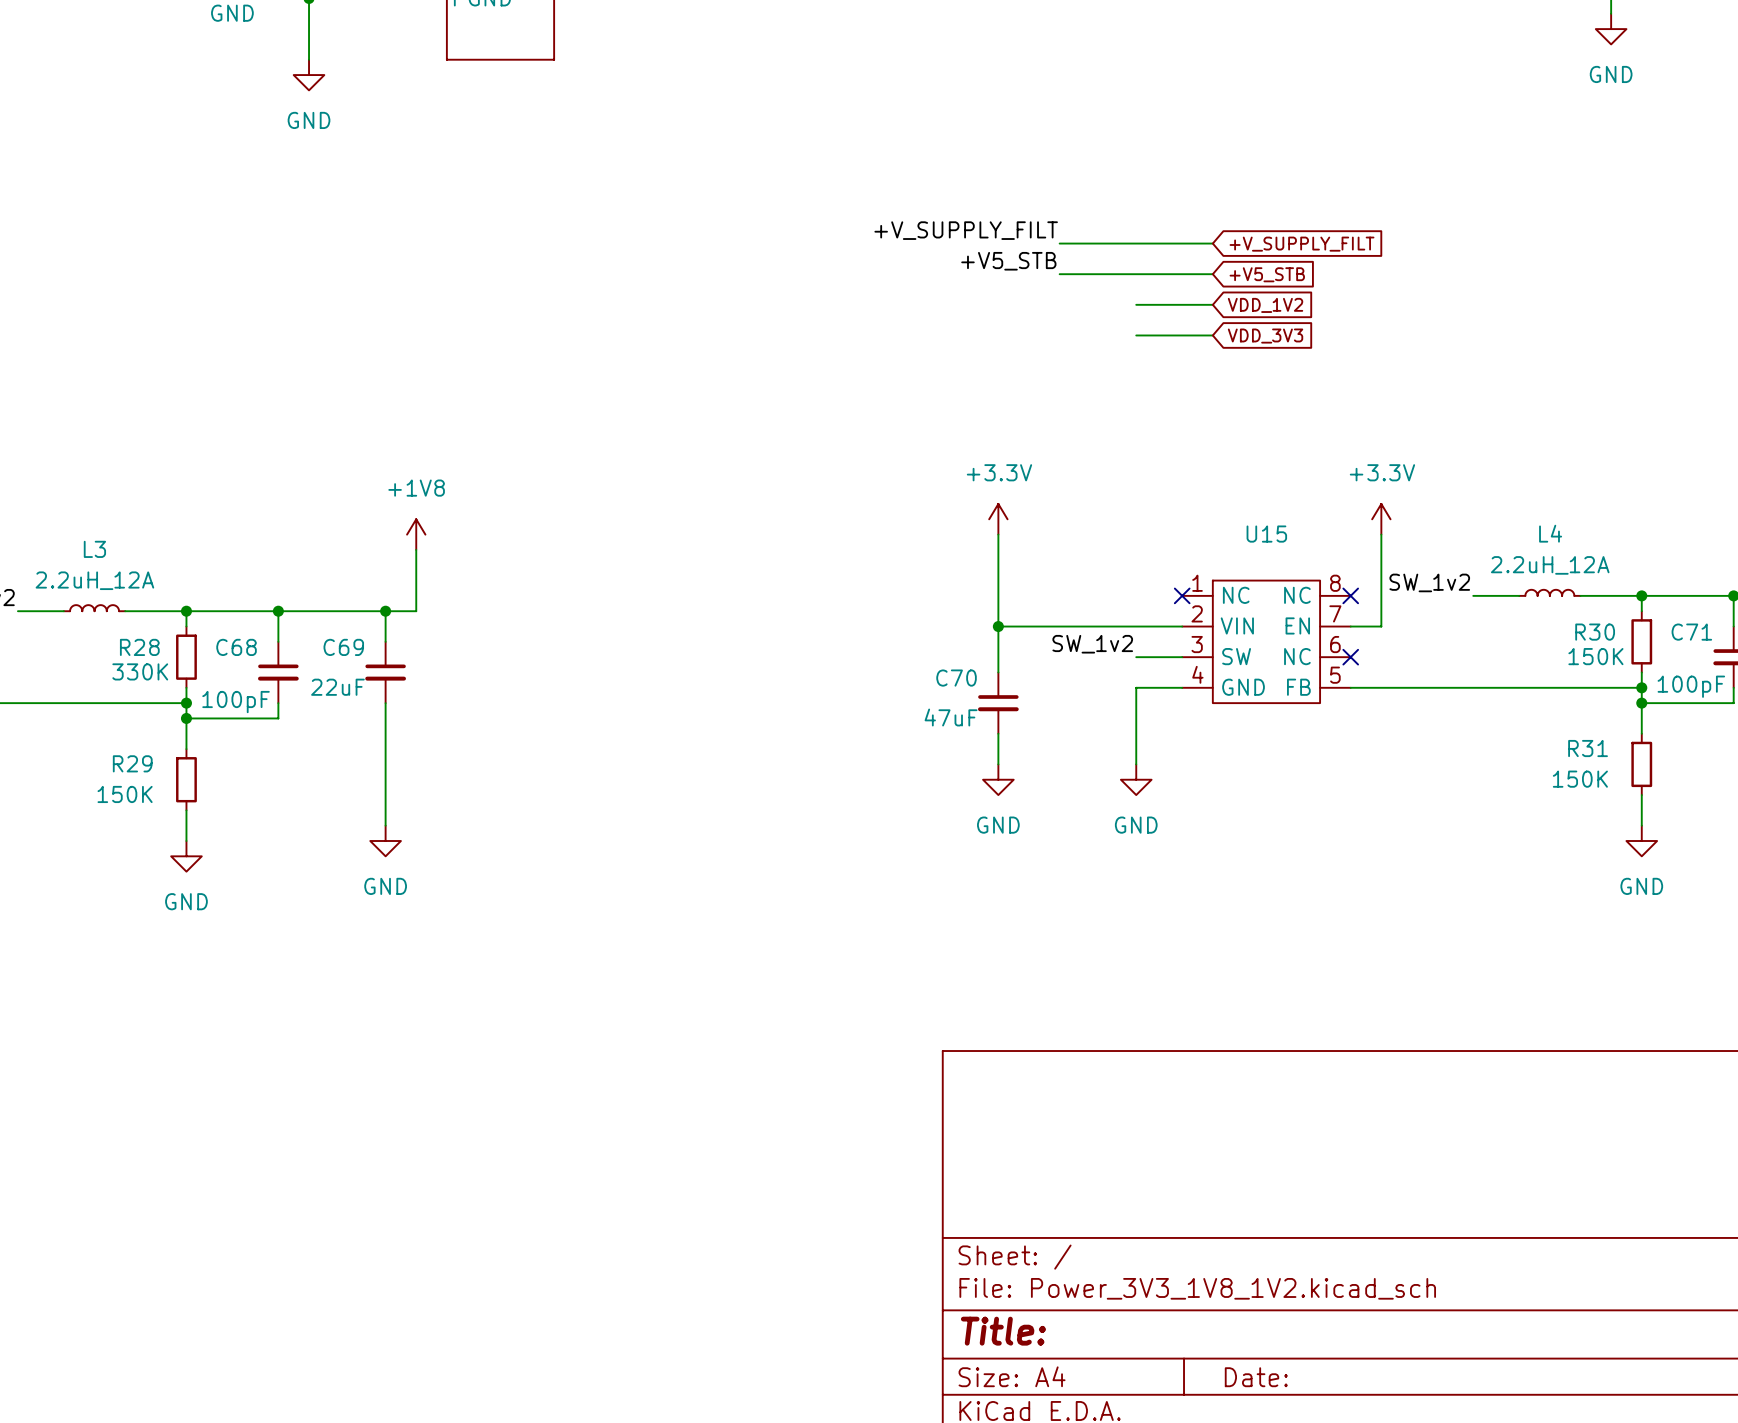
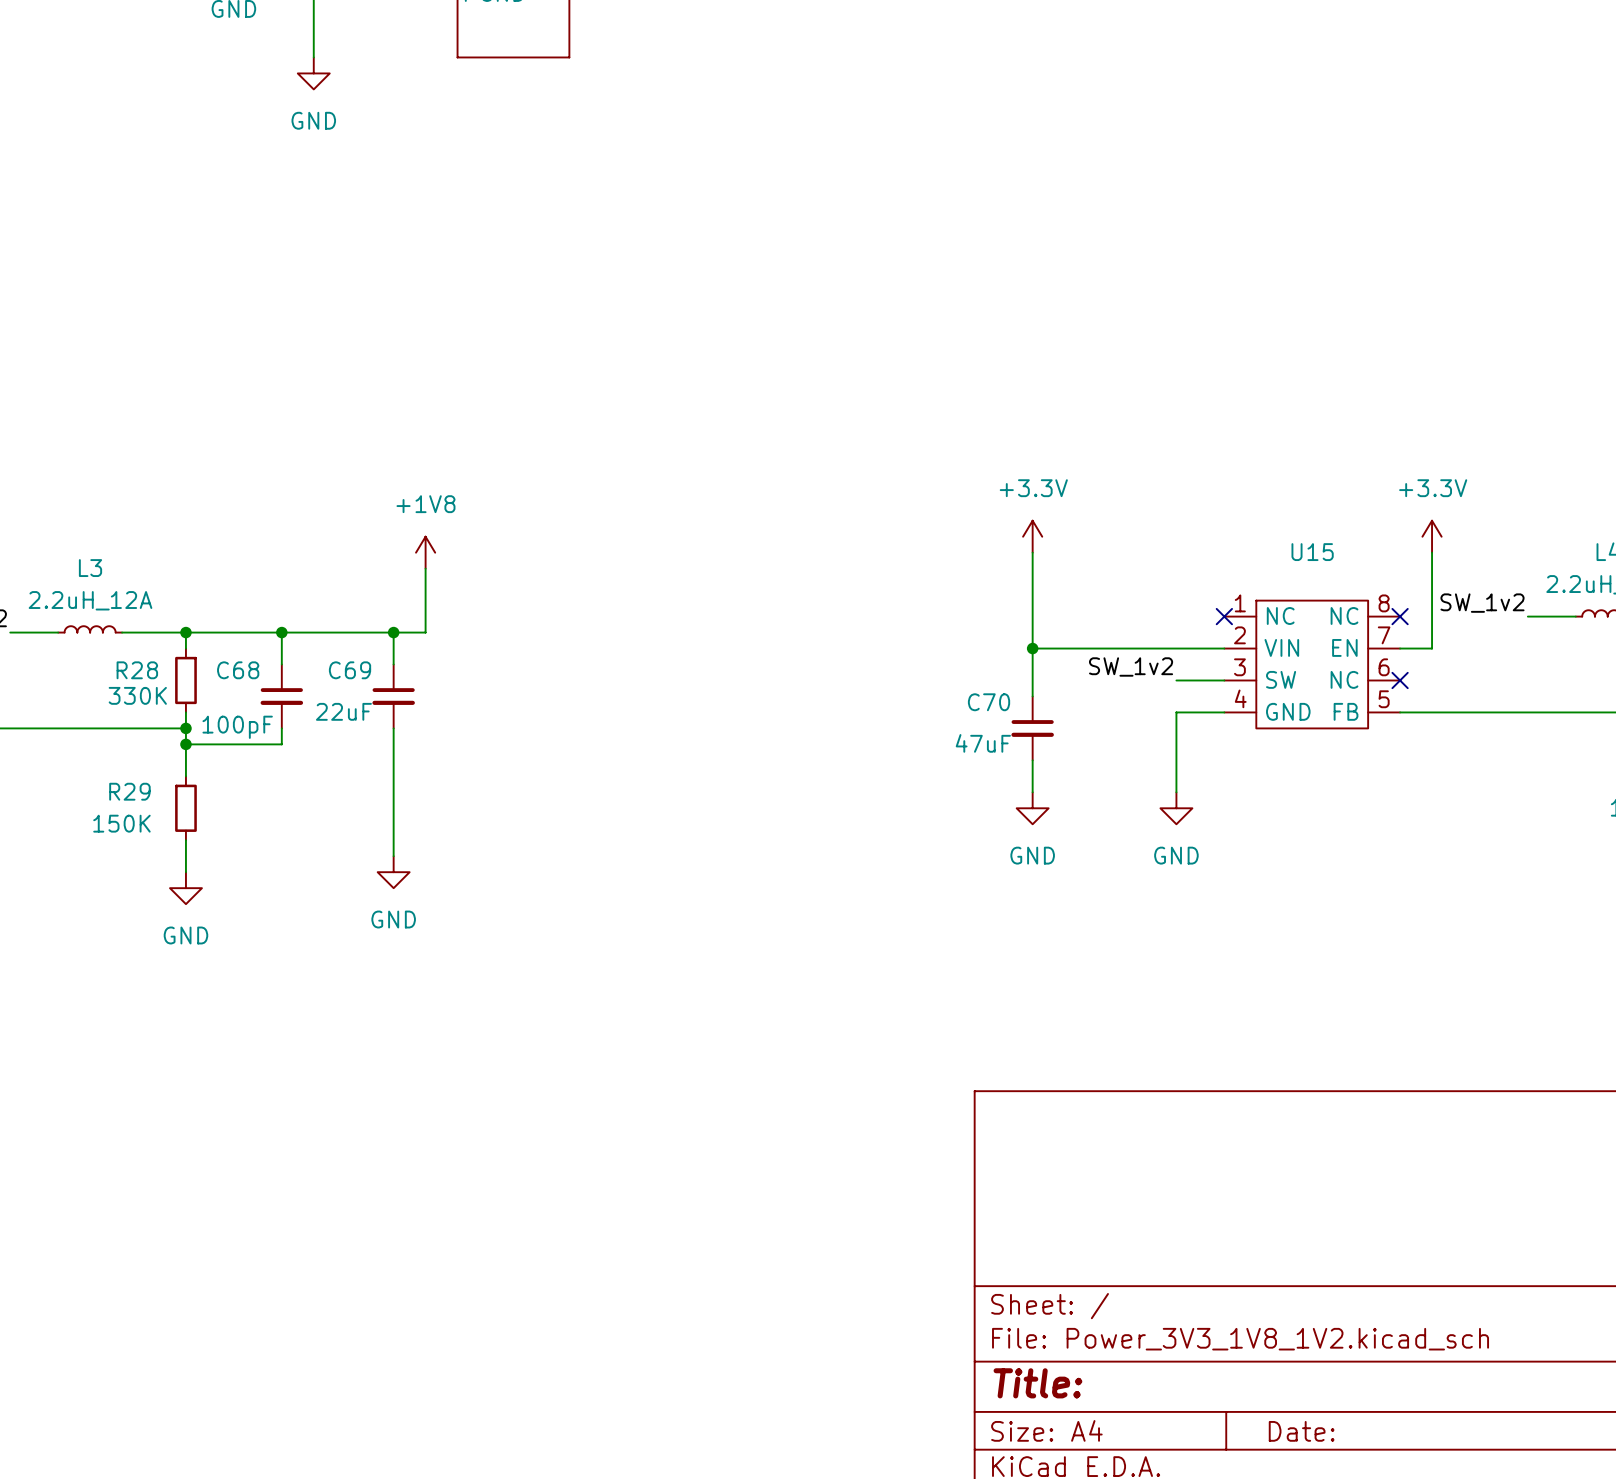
label: +V_SUPPLY_FILT (966, 230) -> none
wire: (1059, 243) (1212, 243) -> none
global label: +V_SUPPLY_FILT (1302, 244) -> none
label: +V5_STB (1008, 261) -> none
wire: (1059, 274) (1212, 274) -> none
global label: +V5_STB (1267, 274) -> none
wire: (1136, 304) (1212, 304) -> none
global label: VDD_1V2 (1265, 305) -> none
wire: (1136, 335) (1212, 335) -> none
global label: VDD_3V3 (1265, 336) -> none

